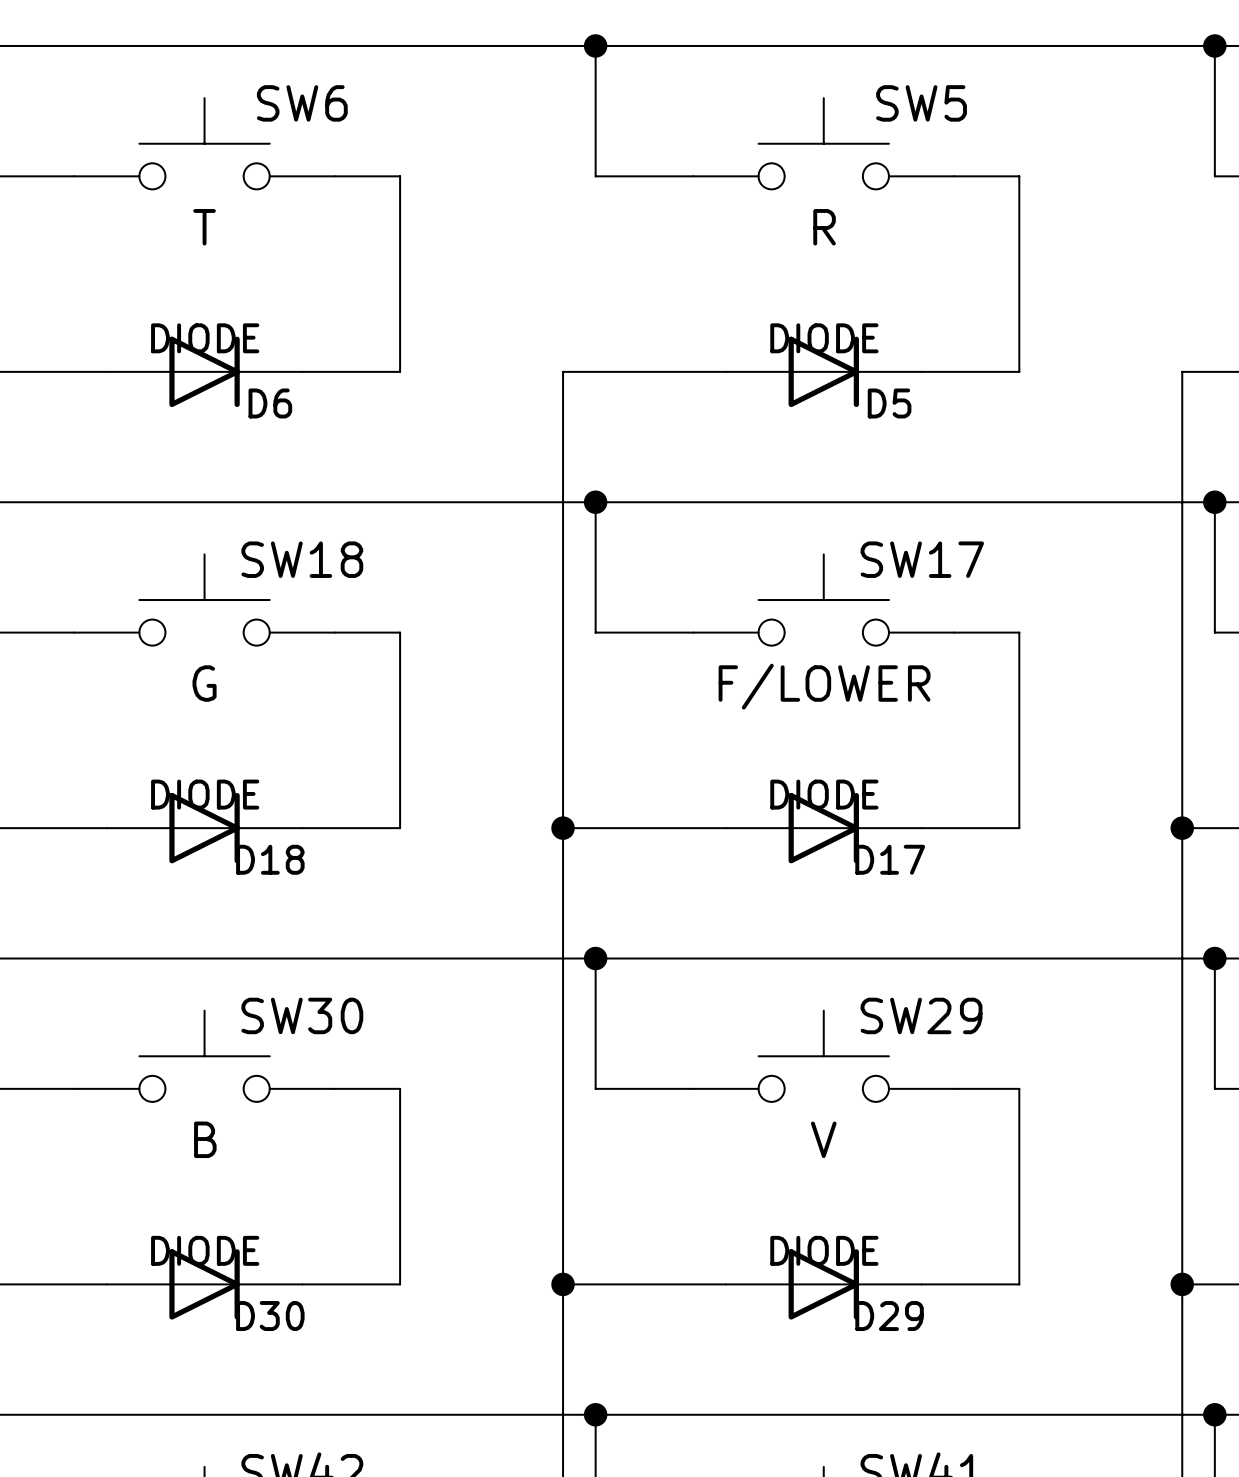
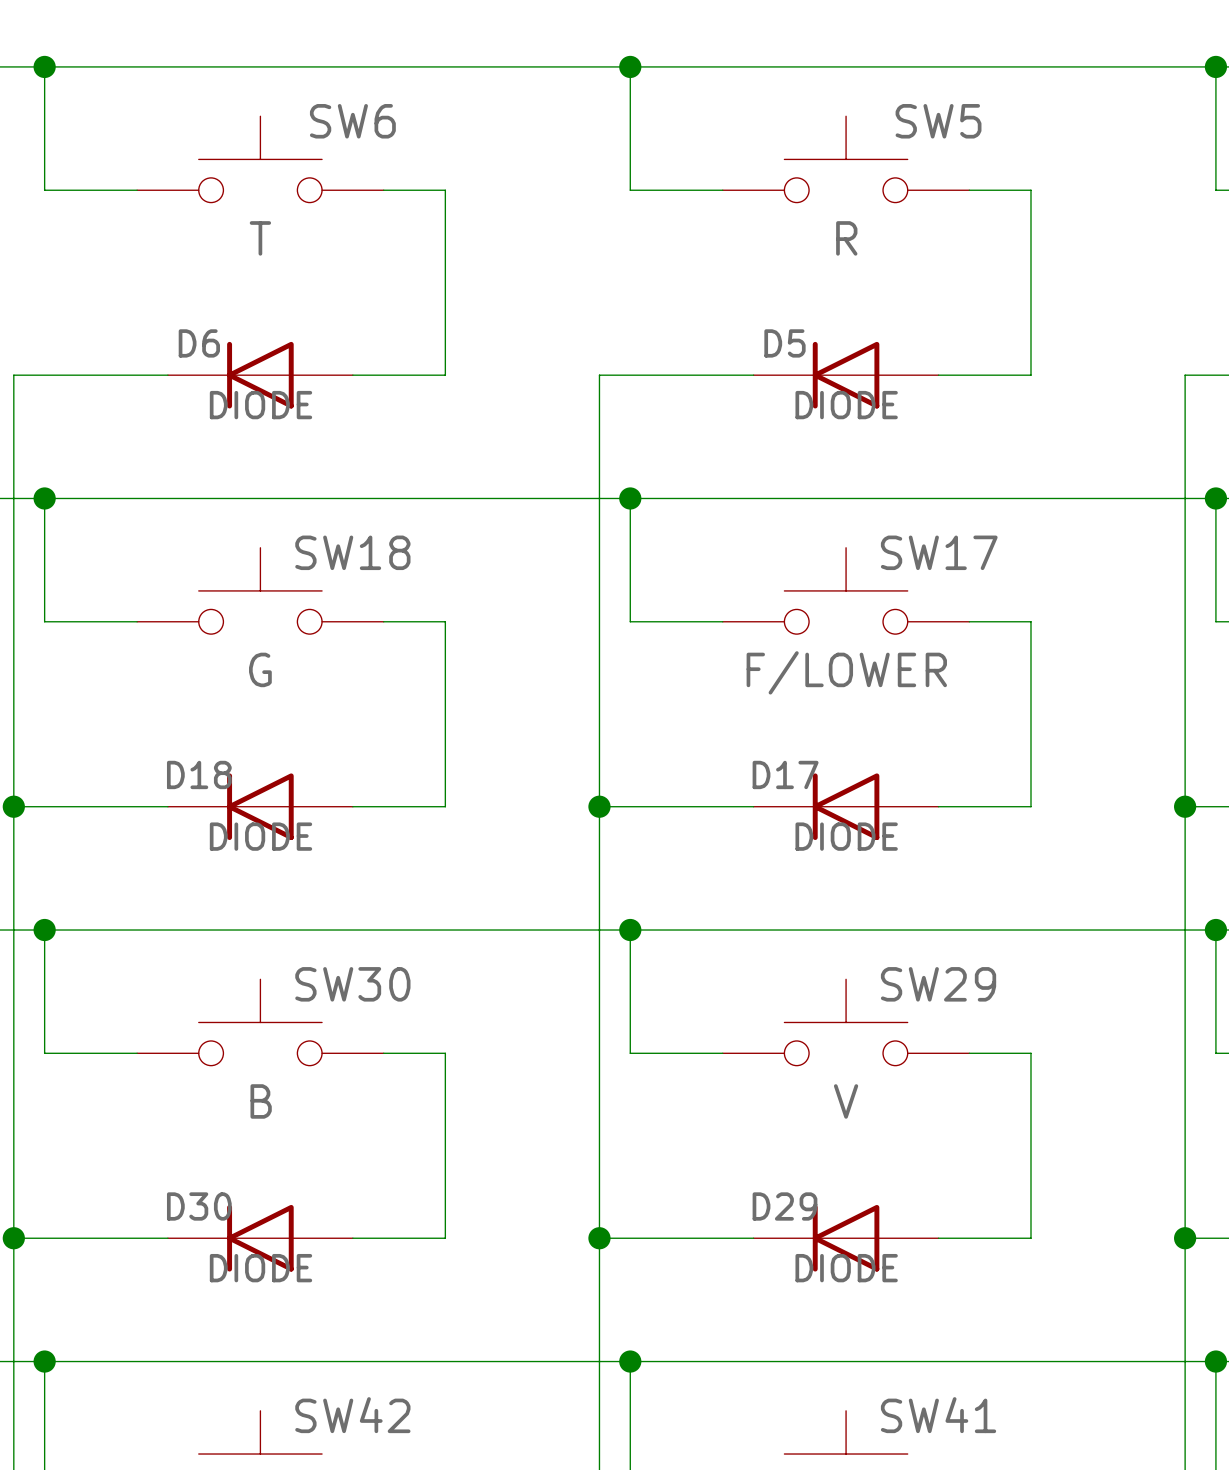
D6 rotation: 0° (204, 371) -> 180° (260, 375)
D5 rotation: 0° (823, 371) -> 180° (846, 375)
D18 rotation: 0° (204, 828) -> 180° (260, 806)
D17 rotation: 0° (823, 828) -> 180° (846, 806)
D30 rotation: 0° (204, 1284) -> 180° (260, 1238)
D29 rotation: 0° (823, 1284) -> 180° (846, 1238)

